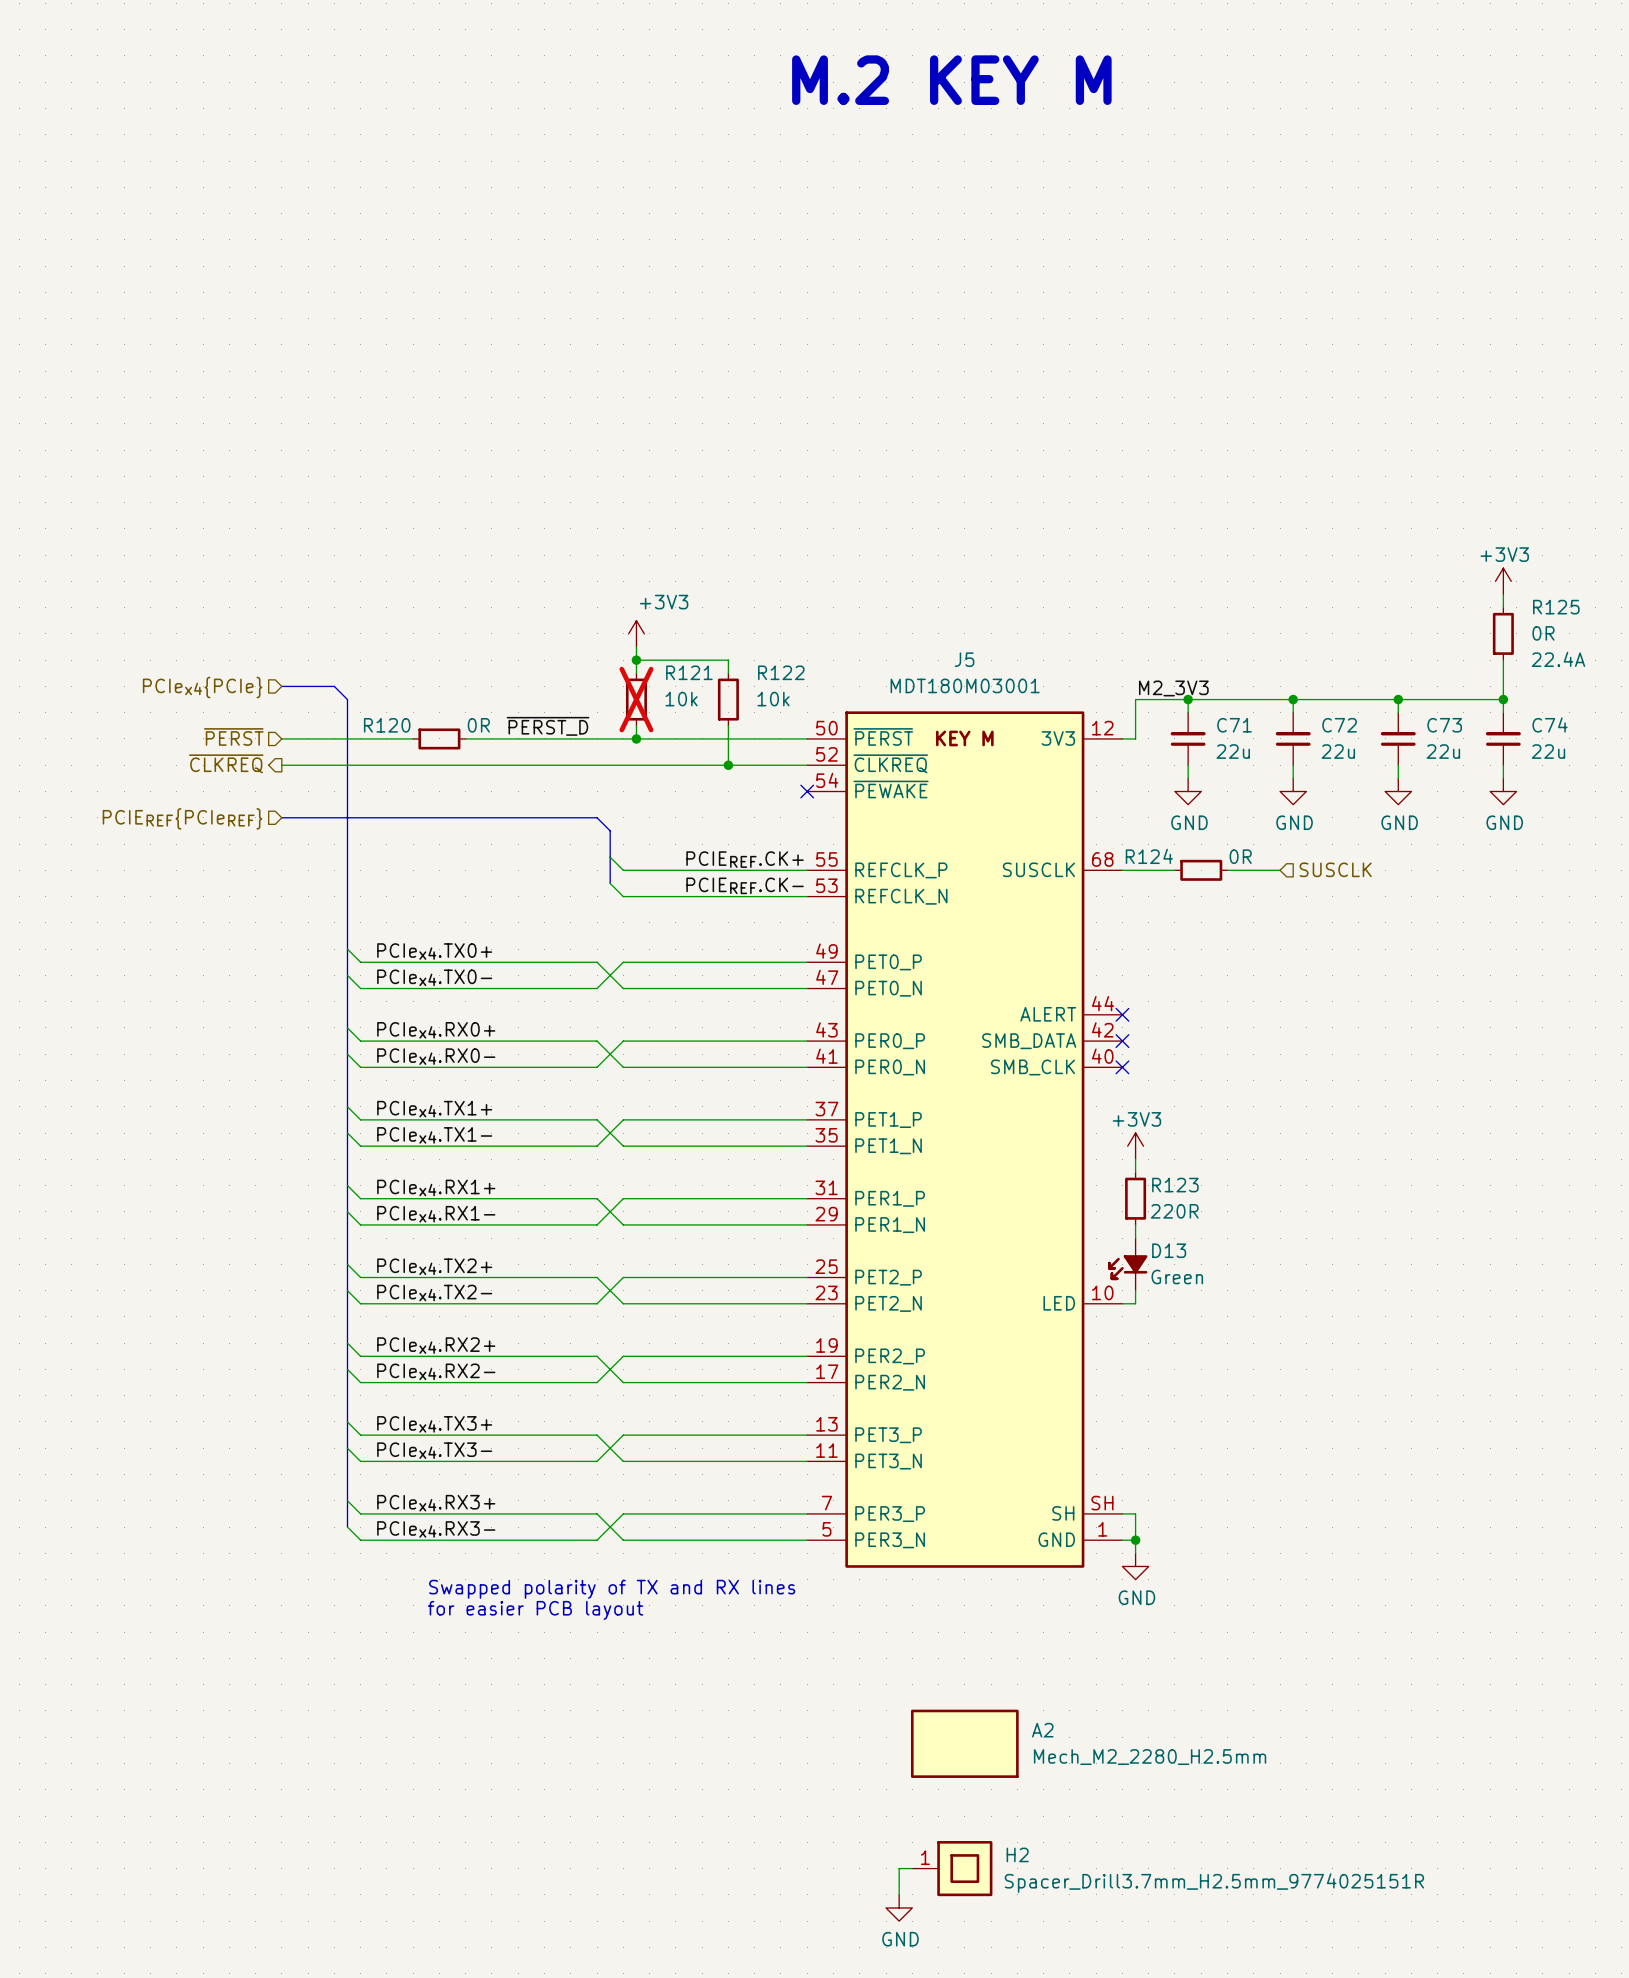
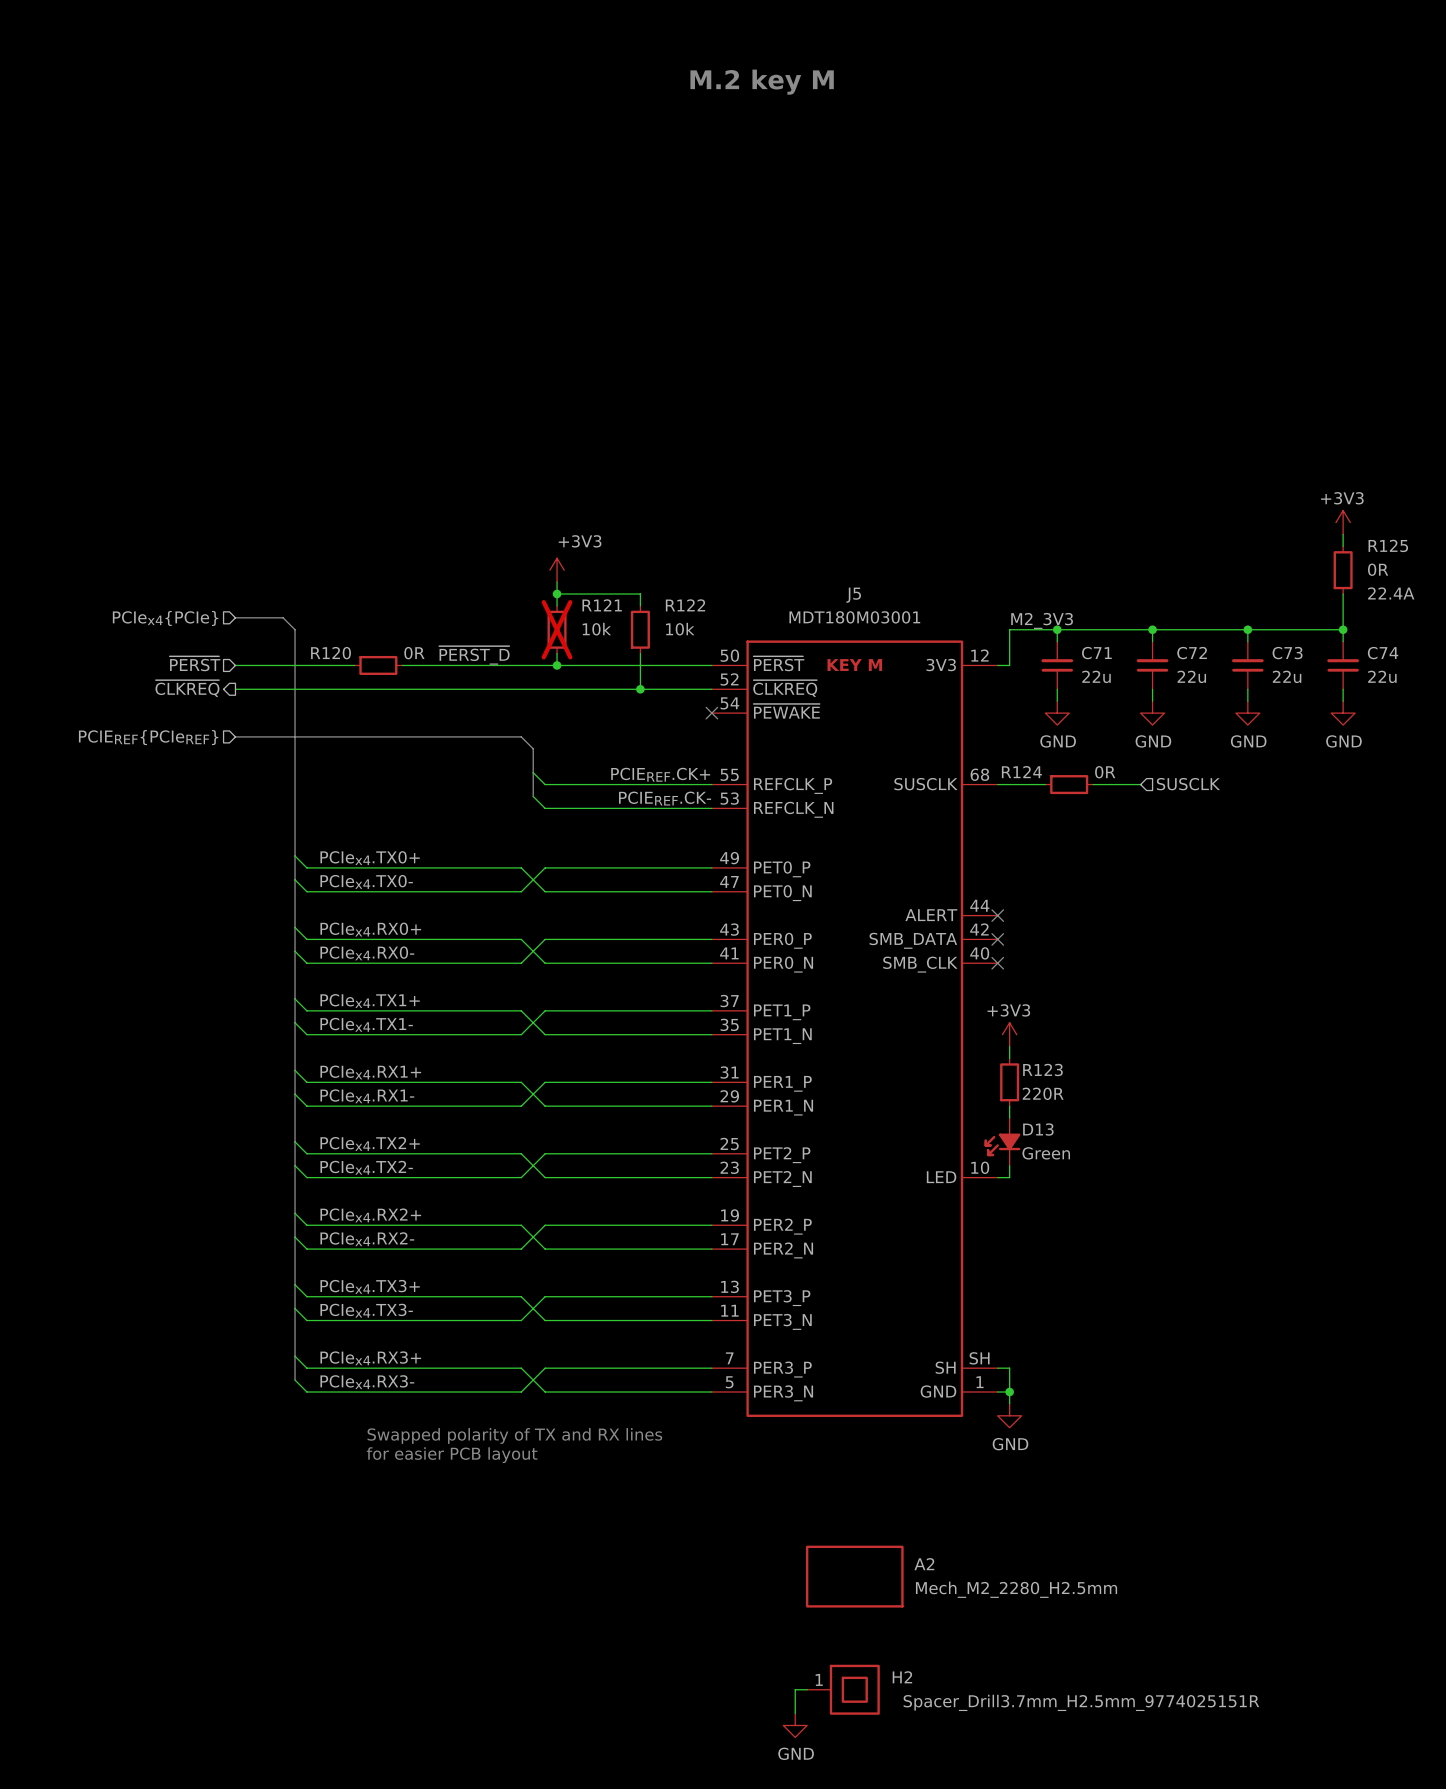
text: M.2 KEY M (951, 80) -> M.2 key M (762, 82)

